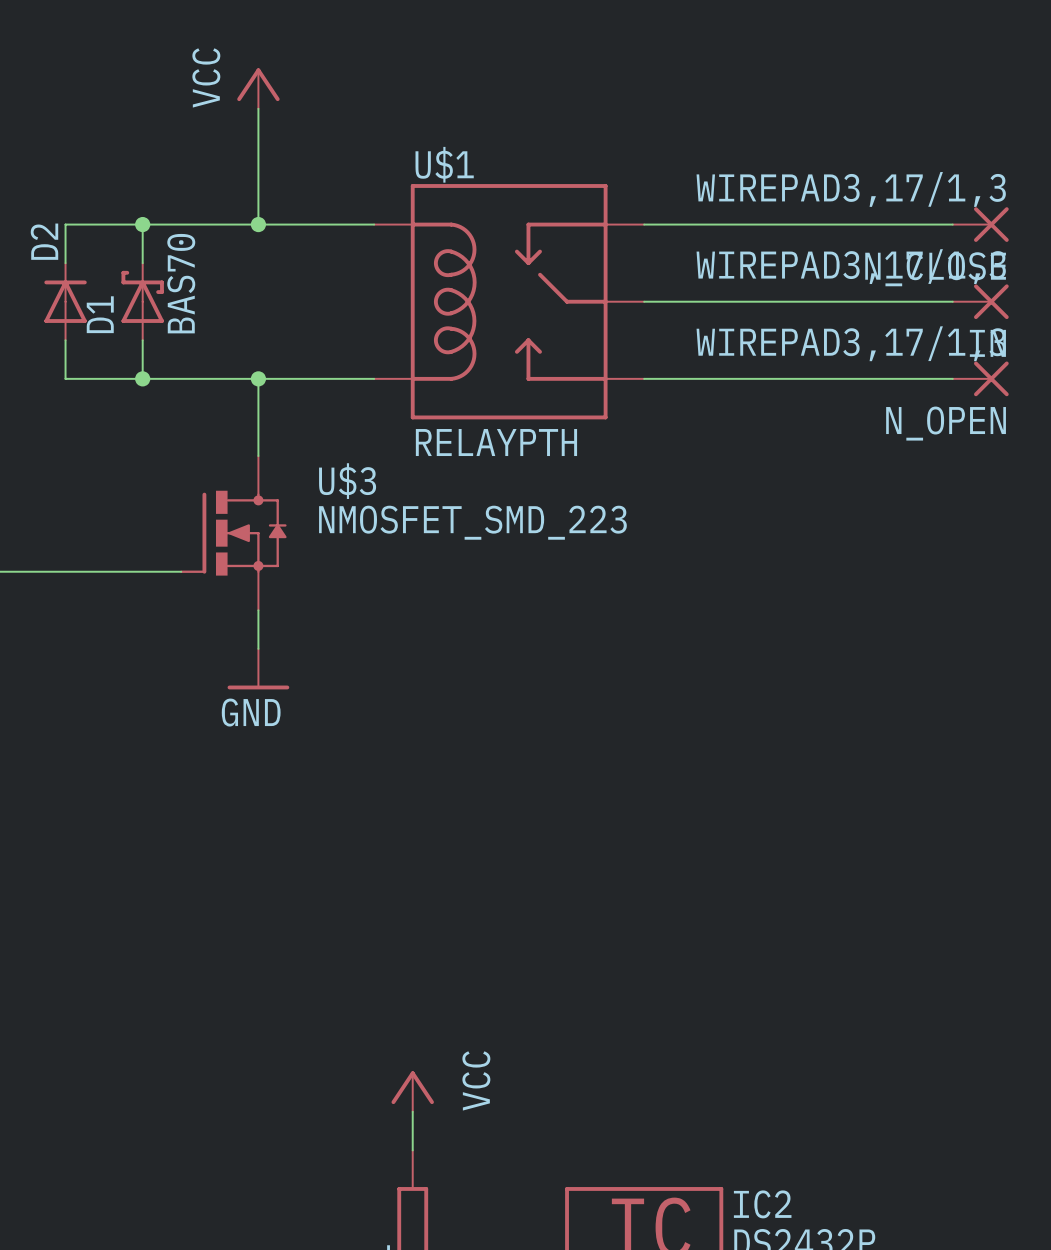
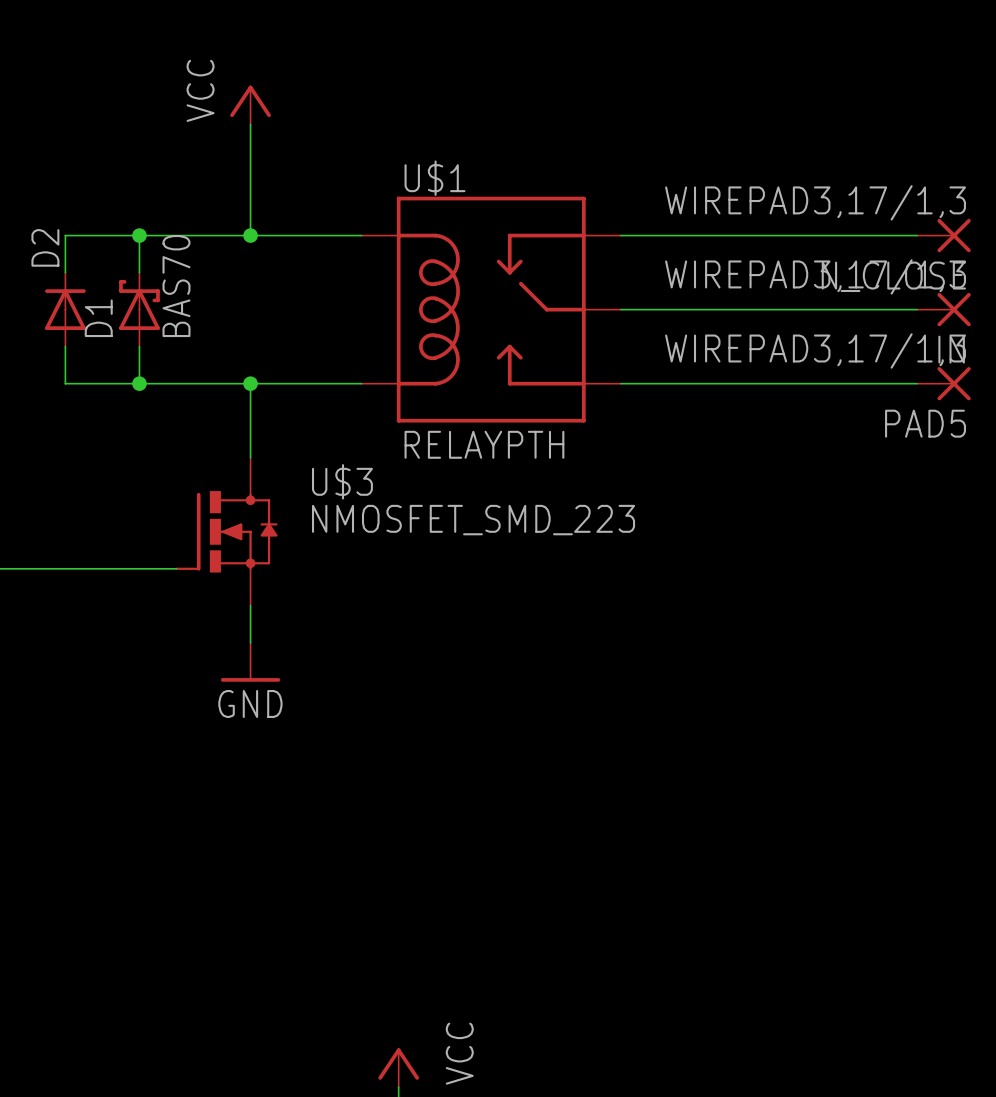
N_OPEN name: N_OPEN (946, 423) -> PAD5 (925, 423)

